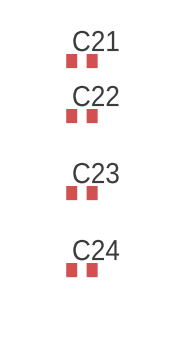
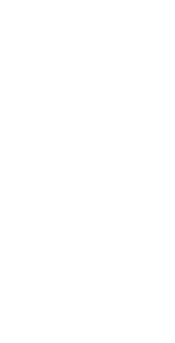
C21: (81, 61) -> none
C22: (81, 116) -> none
C23: (81, 193) -> none
C24: (81, 270) -> none

